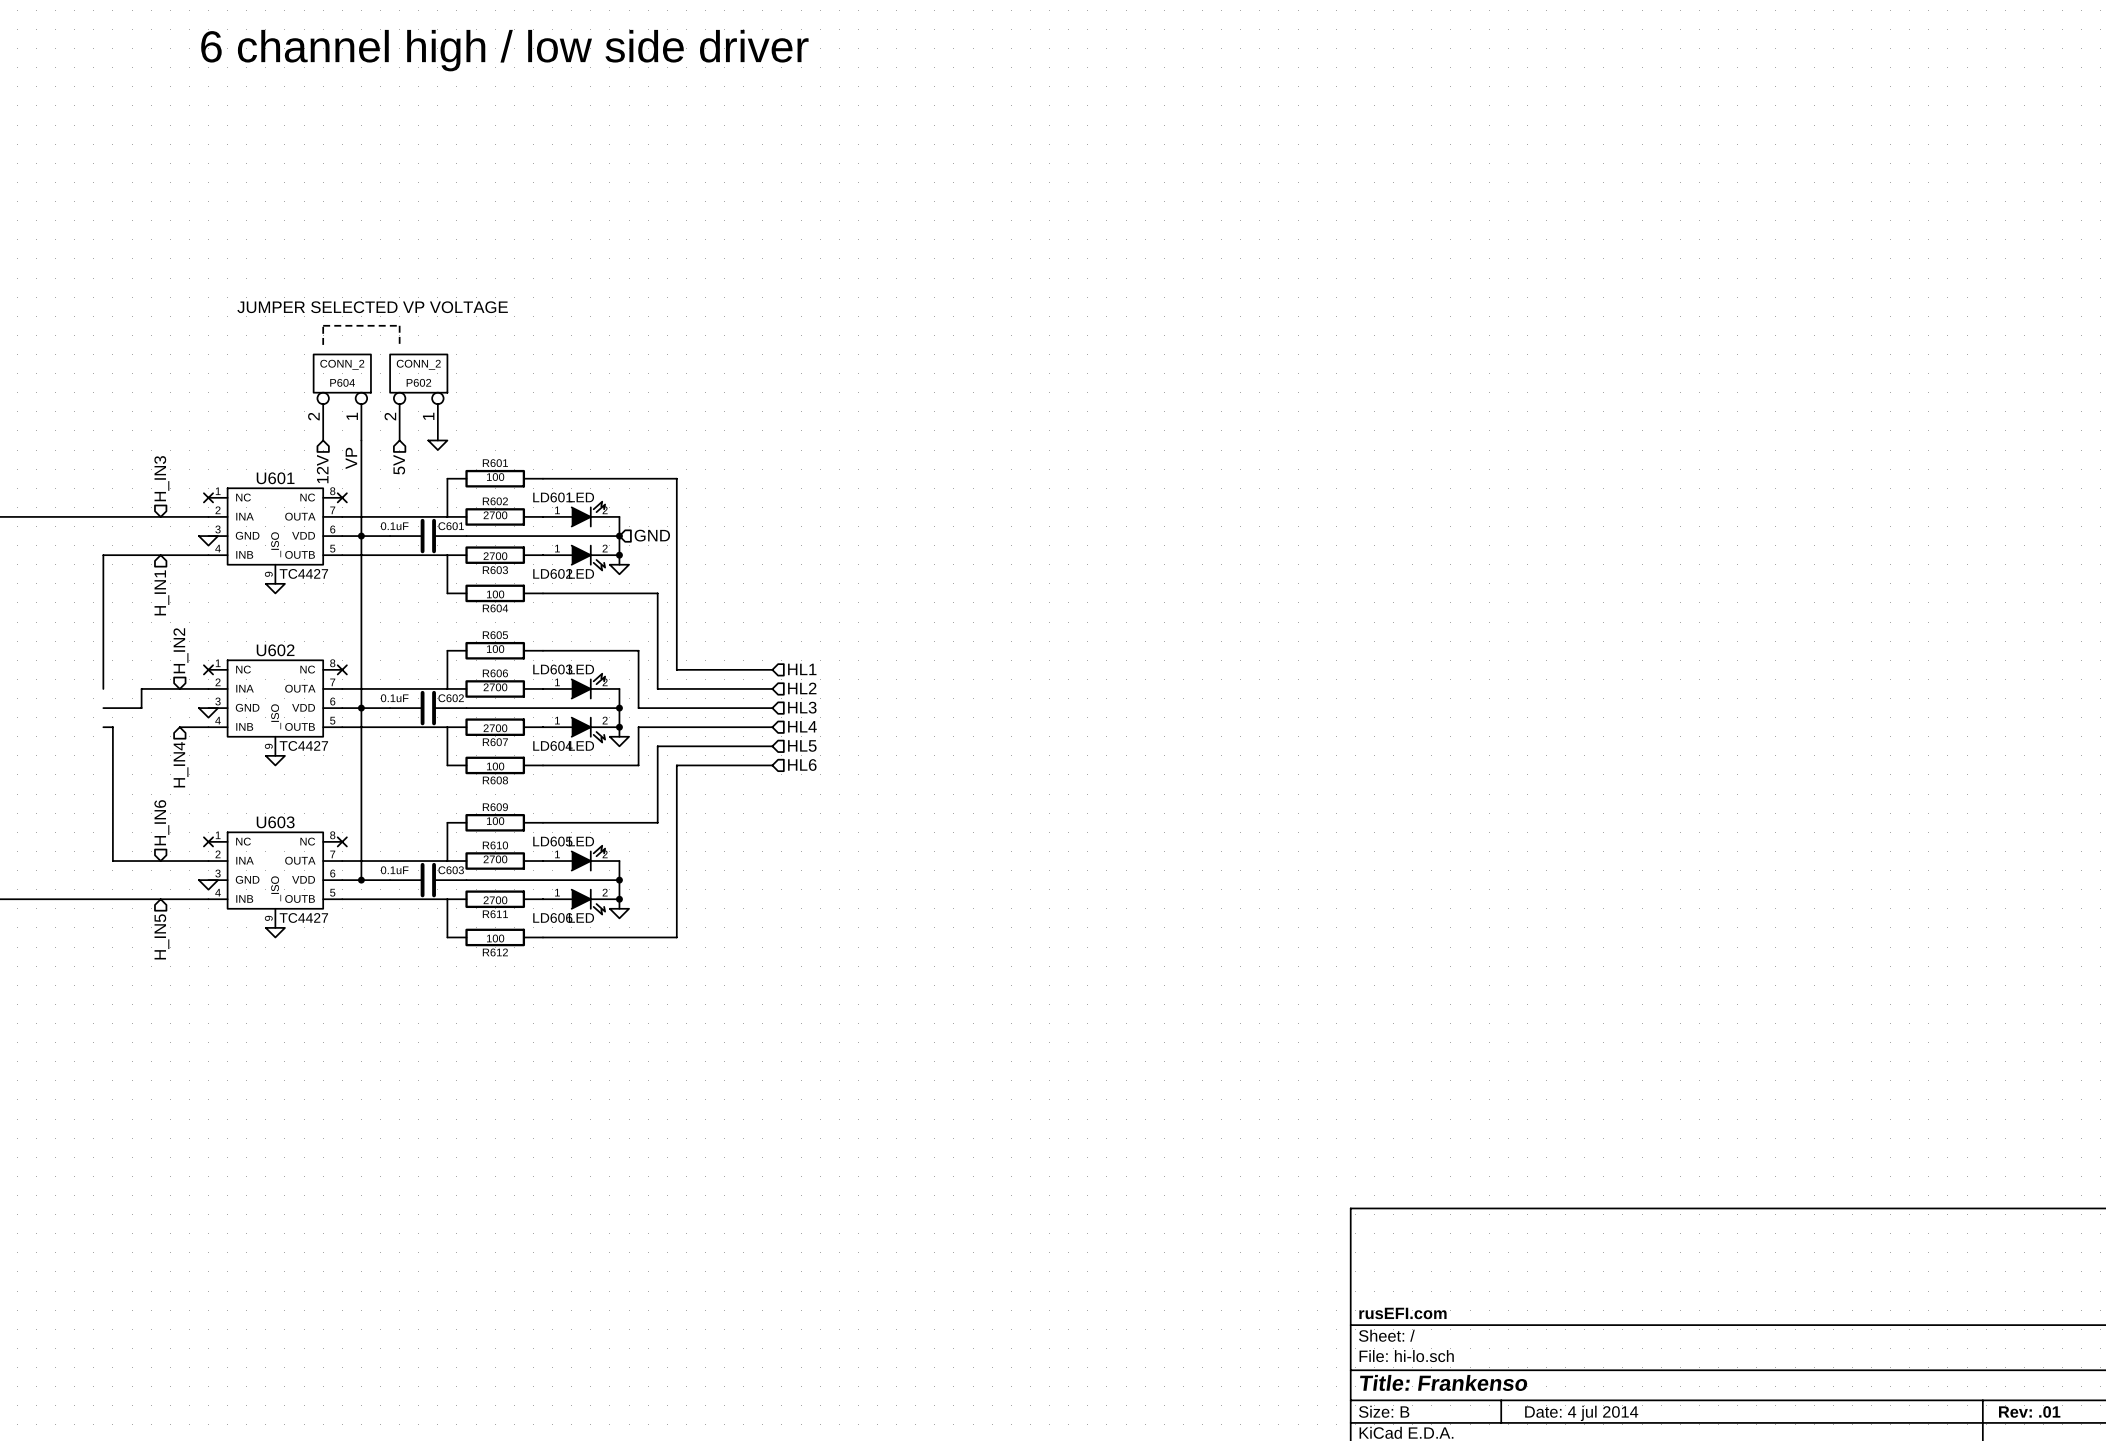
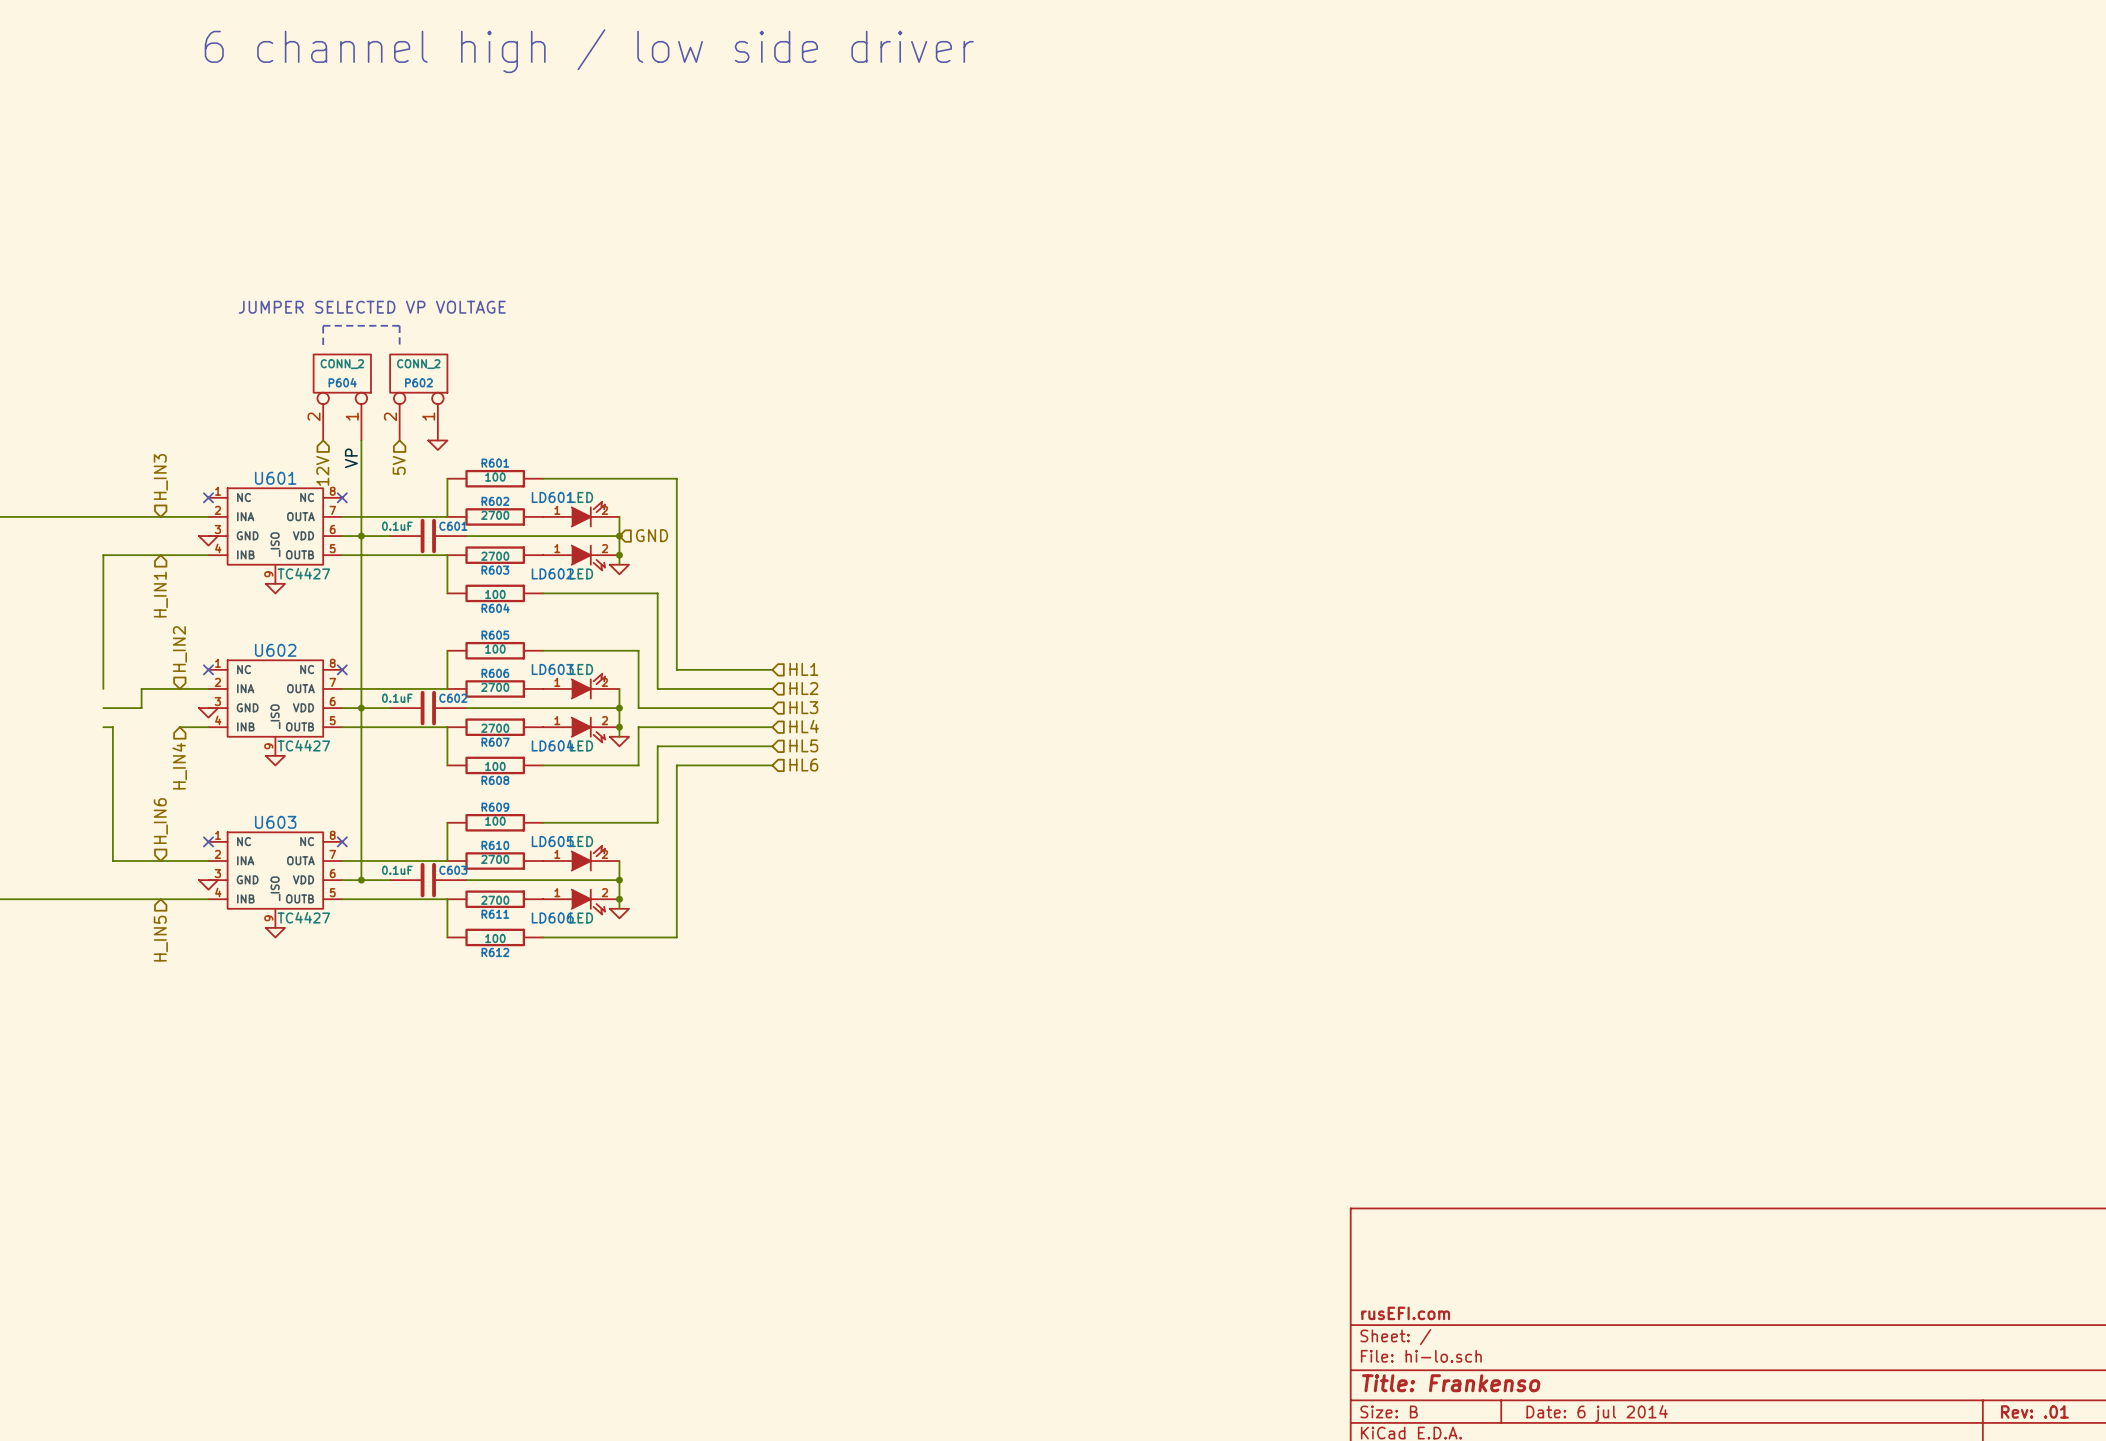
title block: Date: 4 jul 2014 (1581, 1413) -> Date: 6 jul 2014 (1597, 1413)

